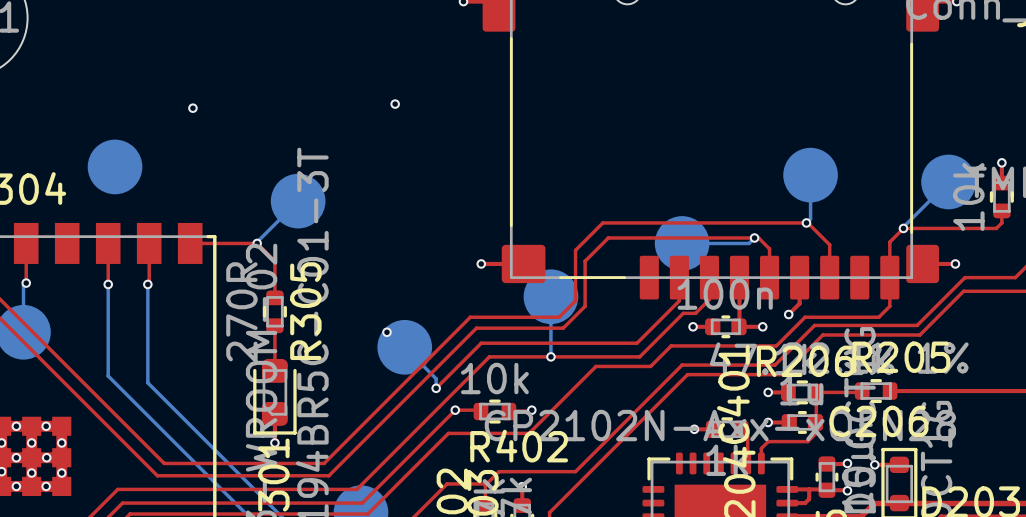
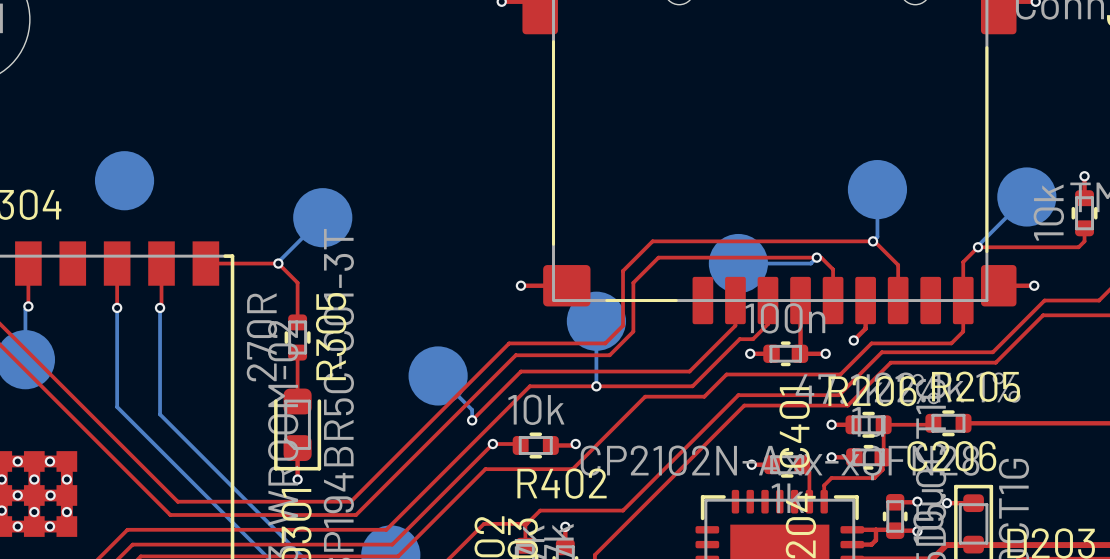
via: (395, 104) -> none
via: (192, 108) -> none
via: (386, 332) -> none

